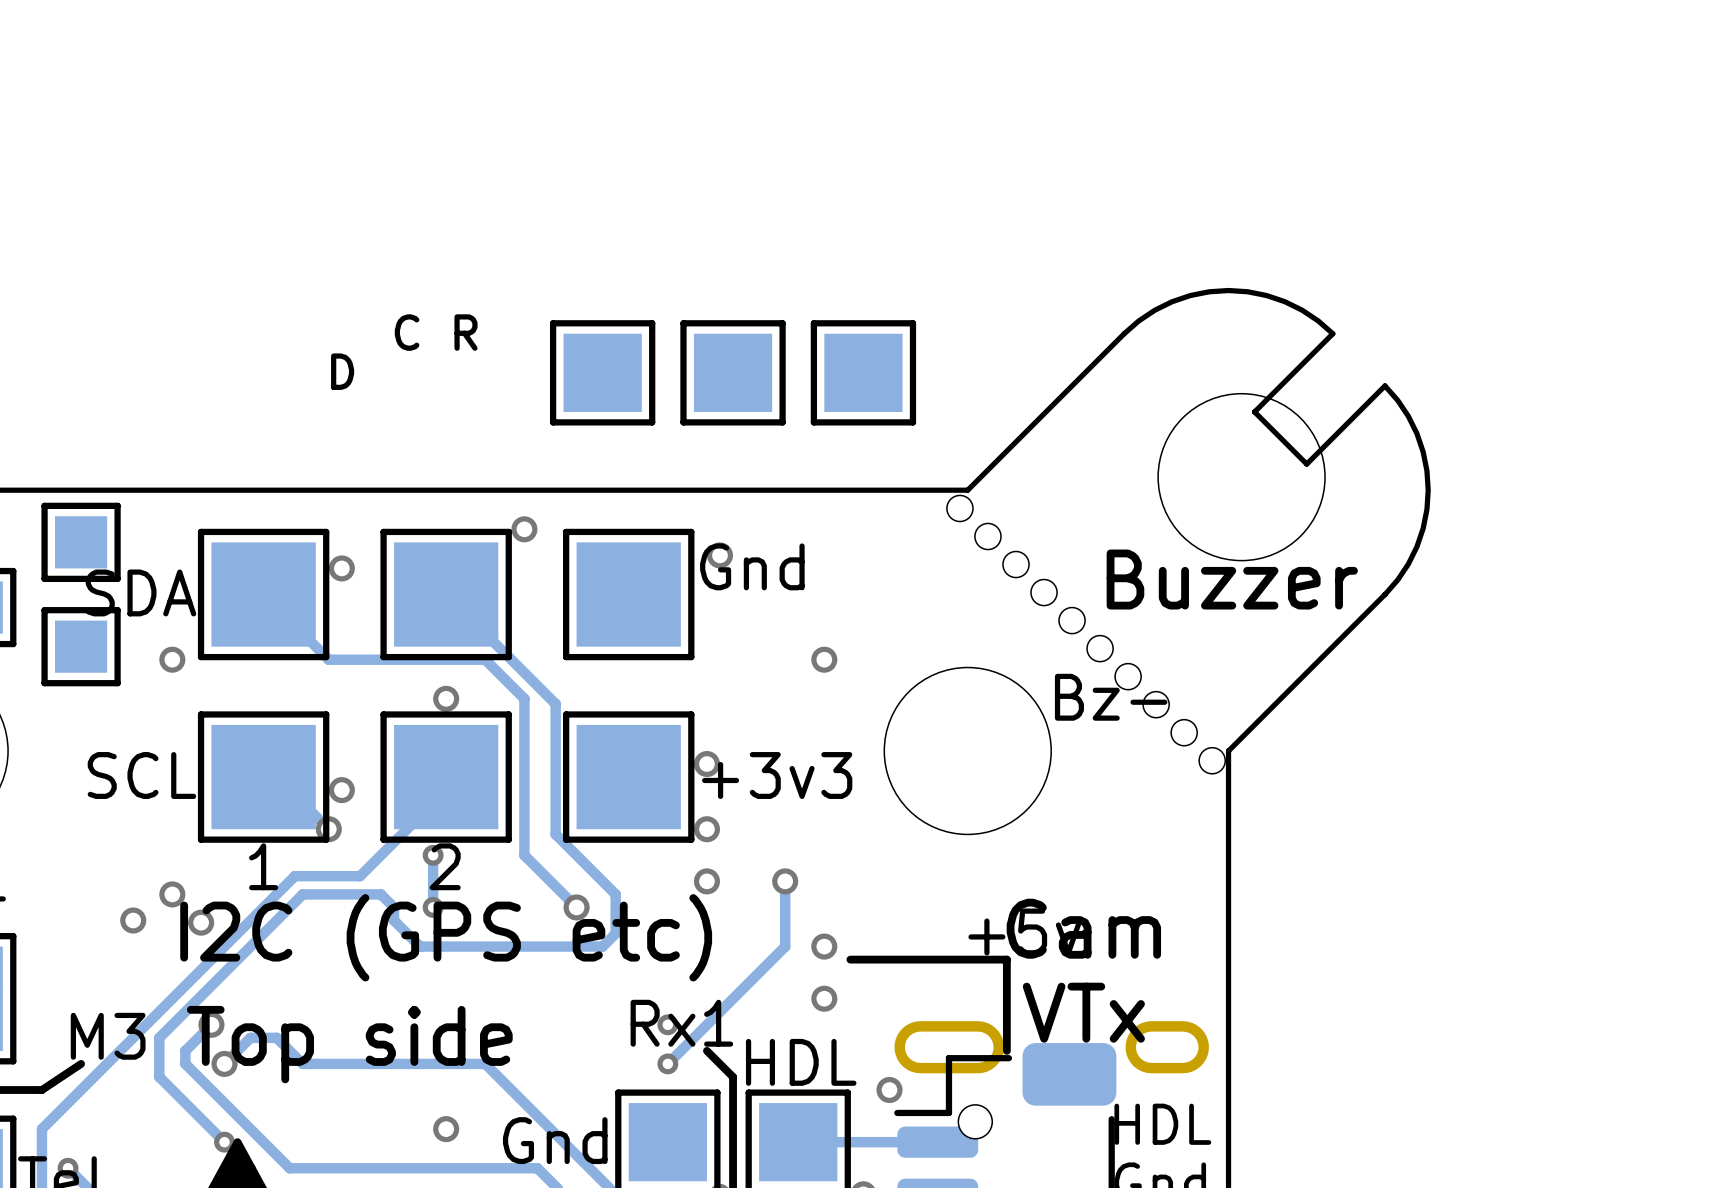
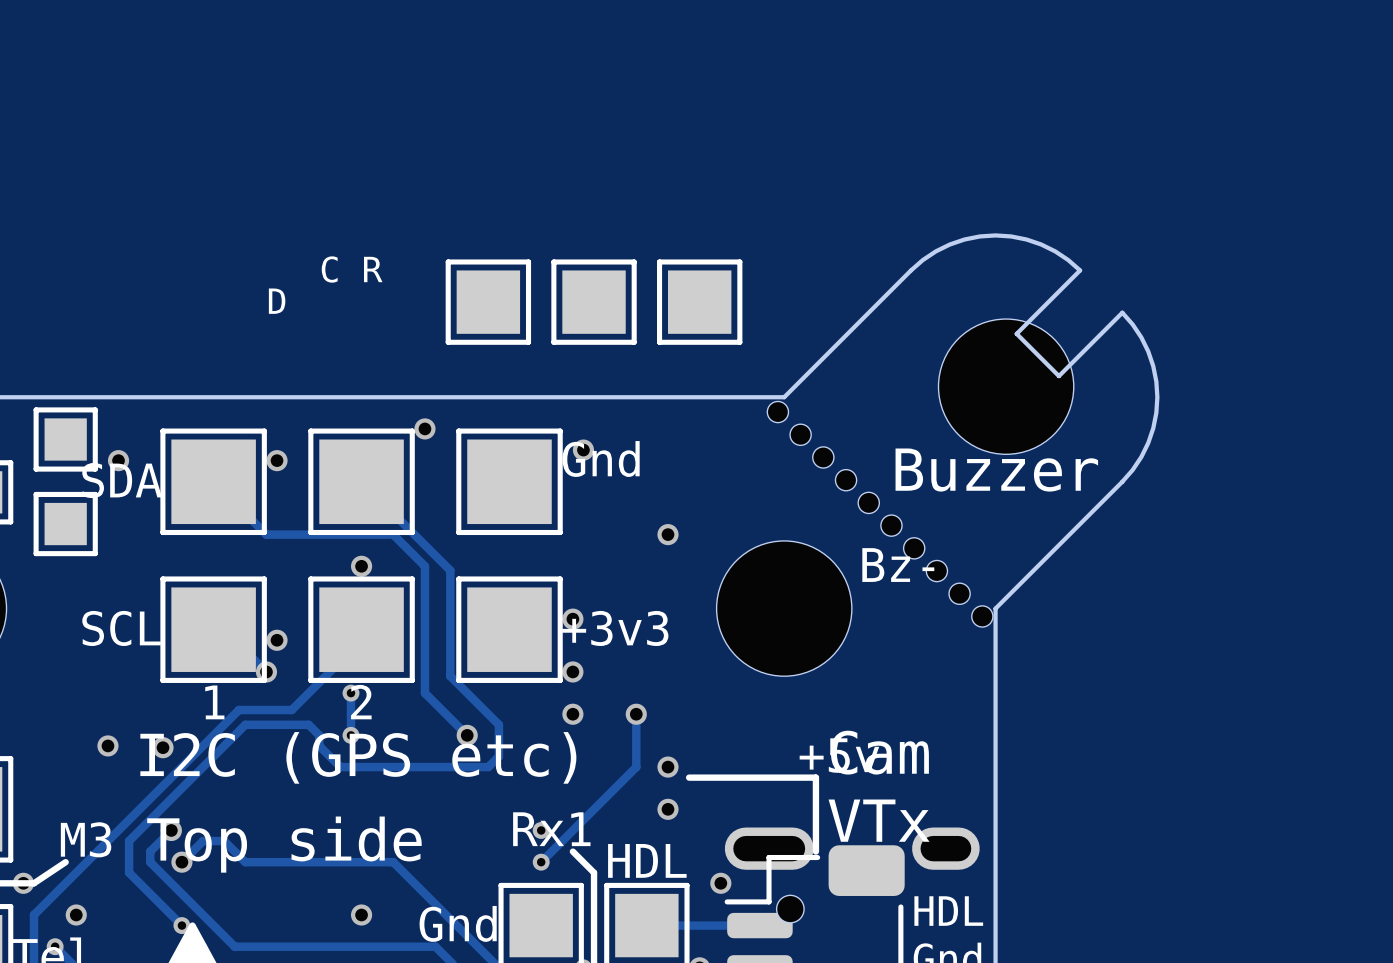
via position: (172, 659) -> (118, 460)
via: (172, 894) -> none
via: none -> (23, 883)
via: none -> (76, 915)

